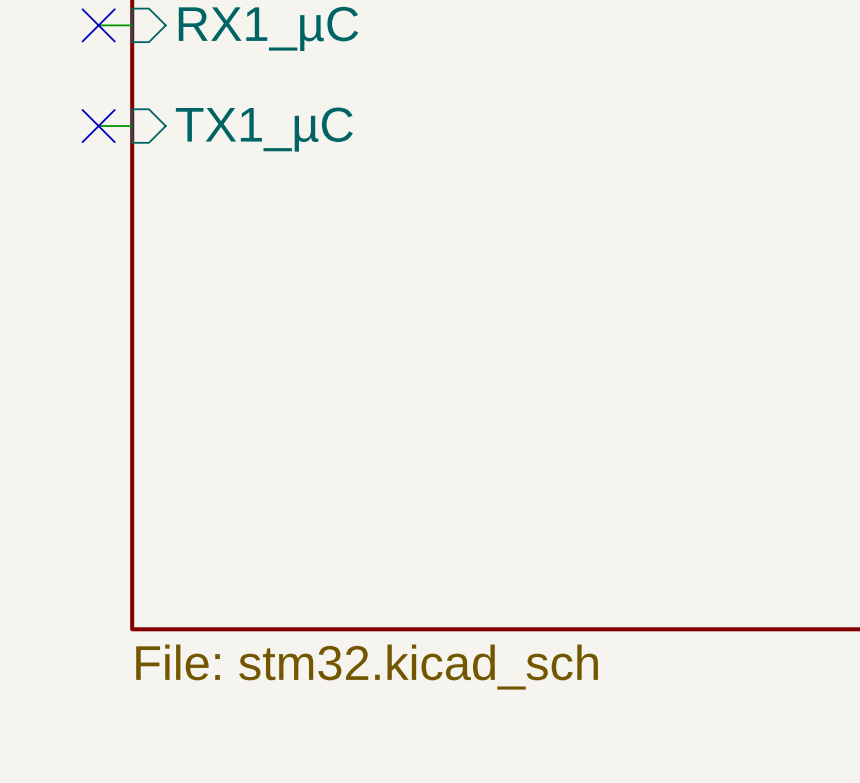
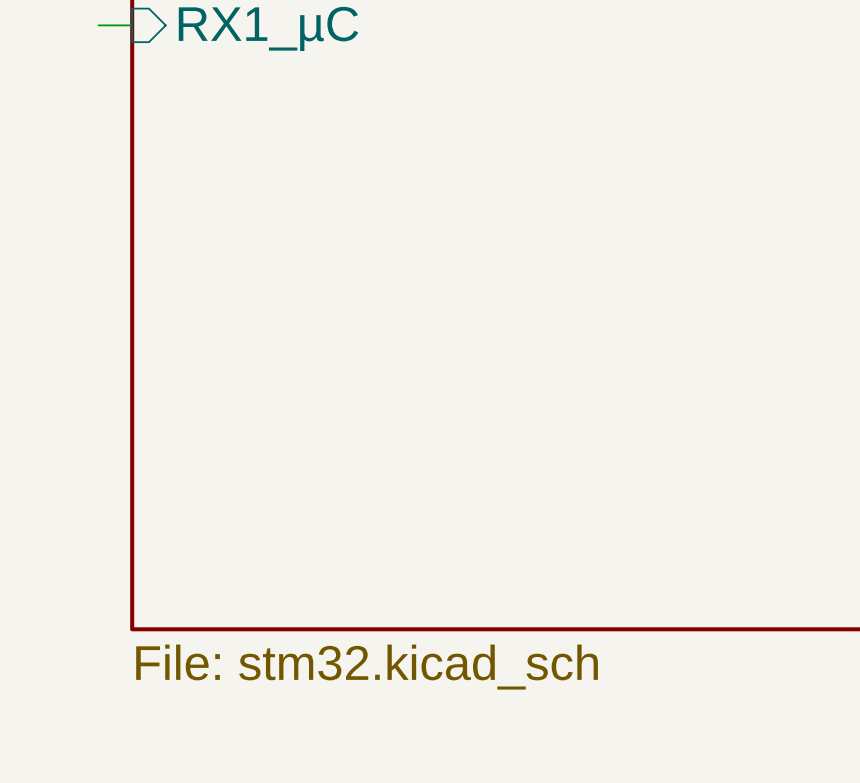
no-connect mark: (98, 25) -> none
wire: (98, 126) (132, 126) -> none
no-connect mark: (98, 126) -> none
sheet pin: TX1_µC (264, 129) -> none

